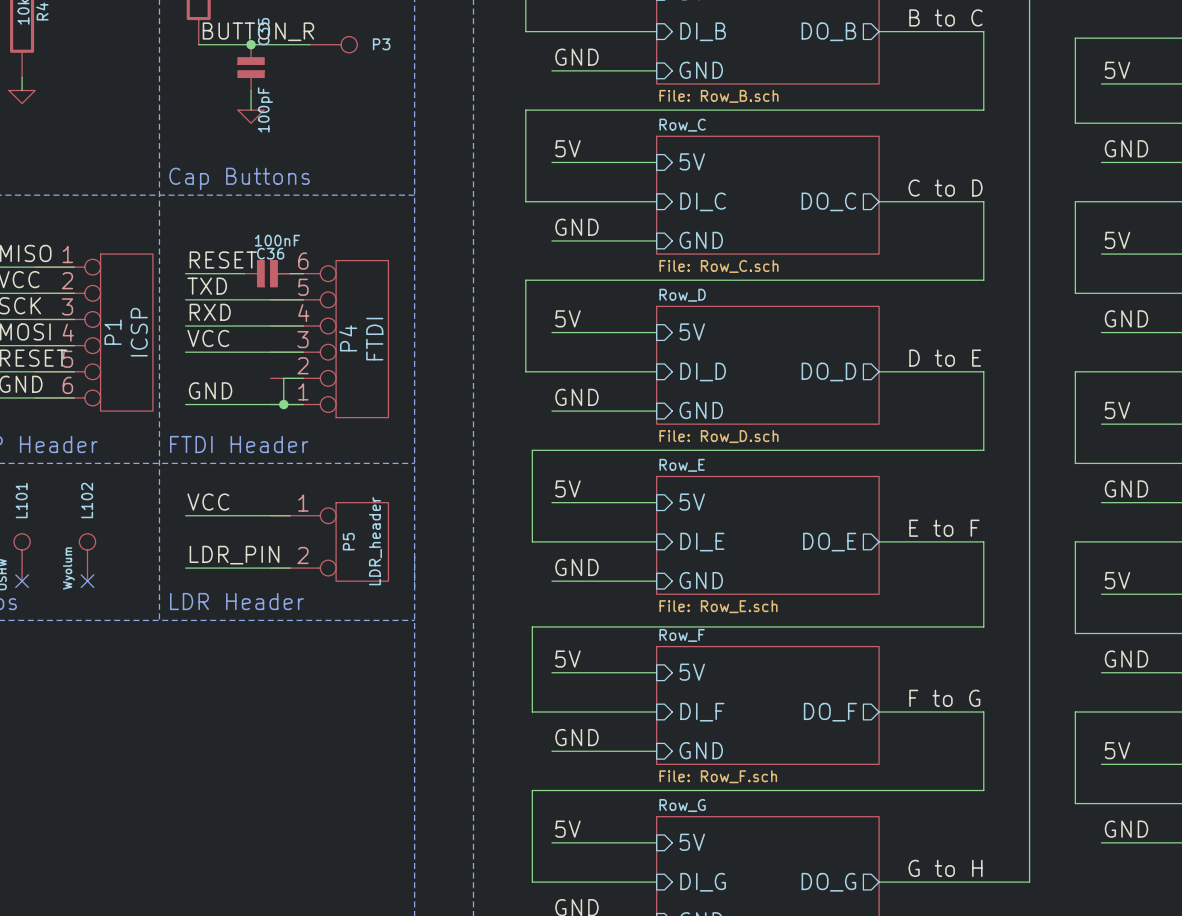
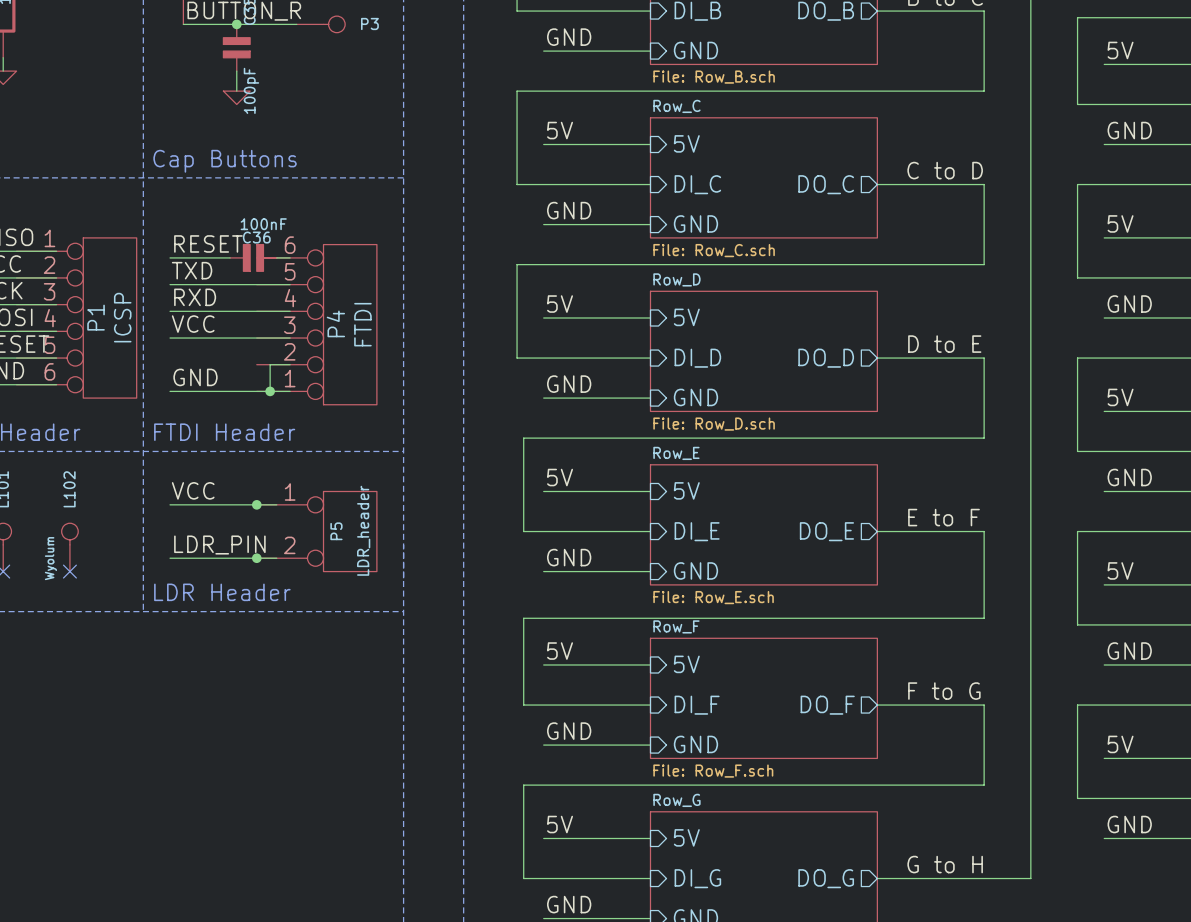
junction: none -> (256, 504)
junction: none -> (256, 558)

